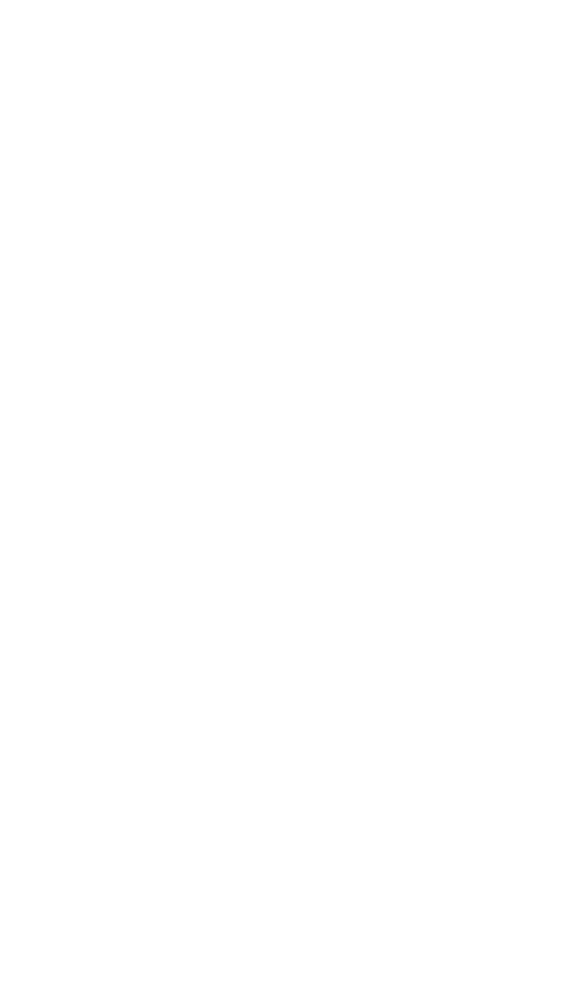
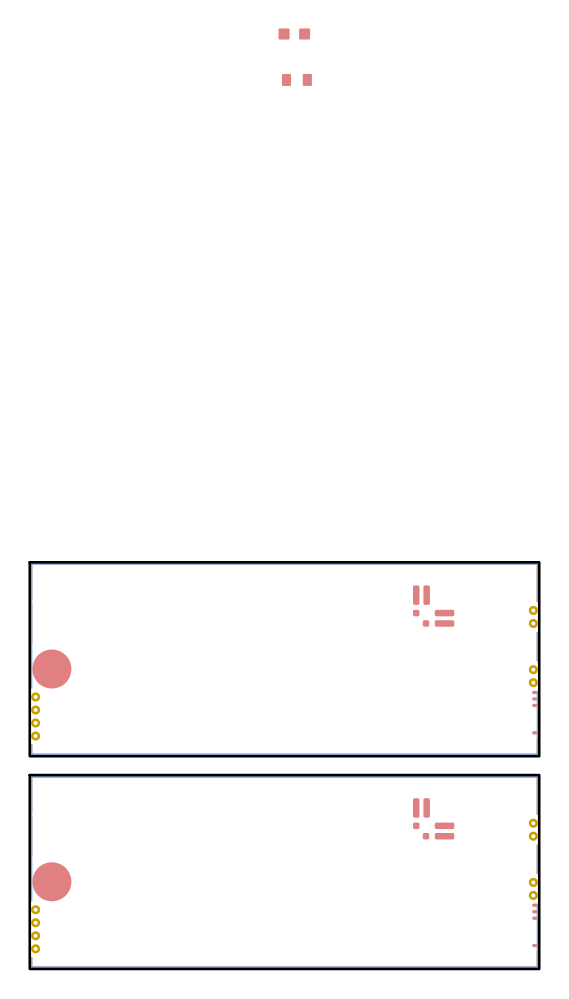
part: none -> (294, 33)
part: none -> (296, 79)
part: none -> (284, 659)
part: none -> (284, 872)

